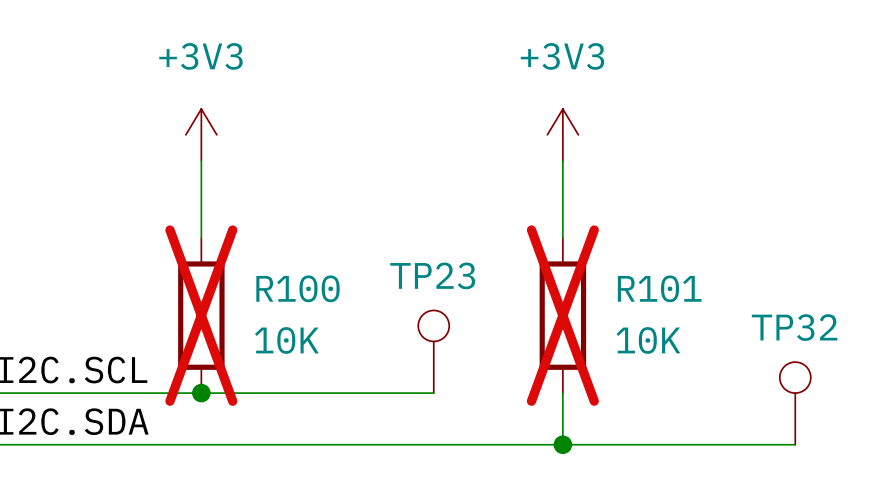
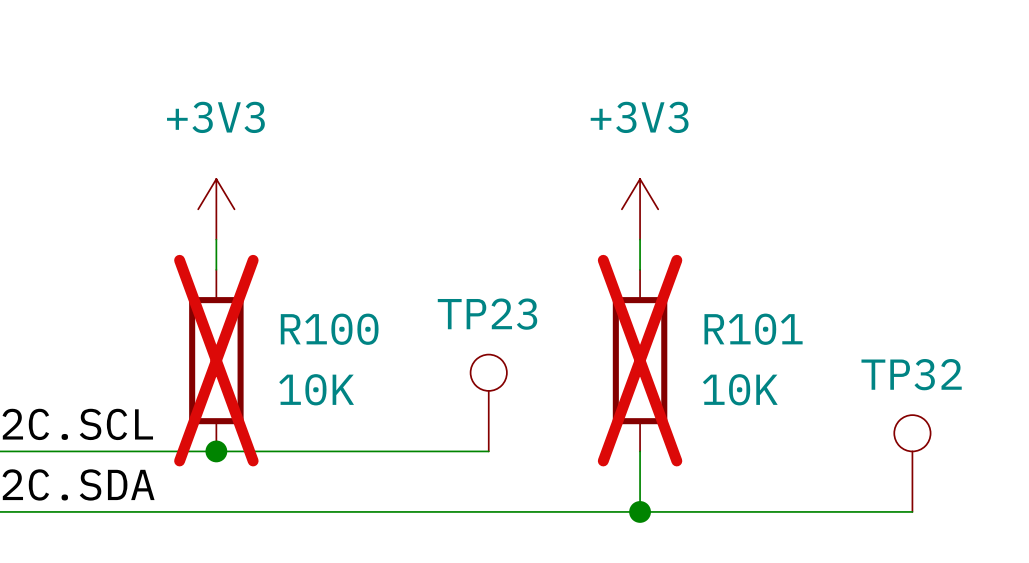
power symbol position: +3V3 (201, 134) -> +3V3 (216, 209)
power symbol position: +3V3 (562, 134) -> +3V3 (640, 209)

